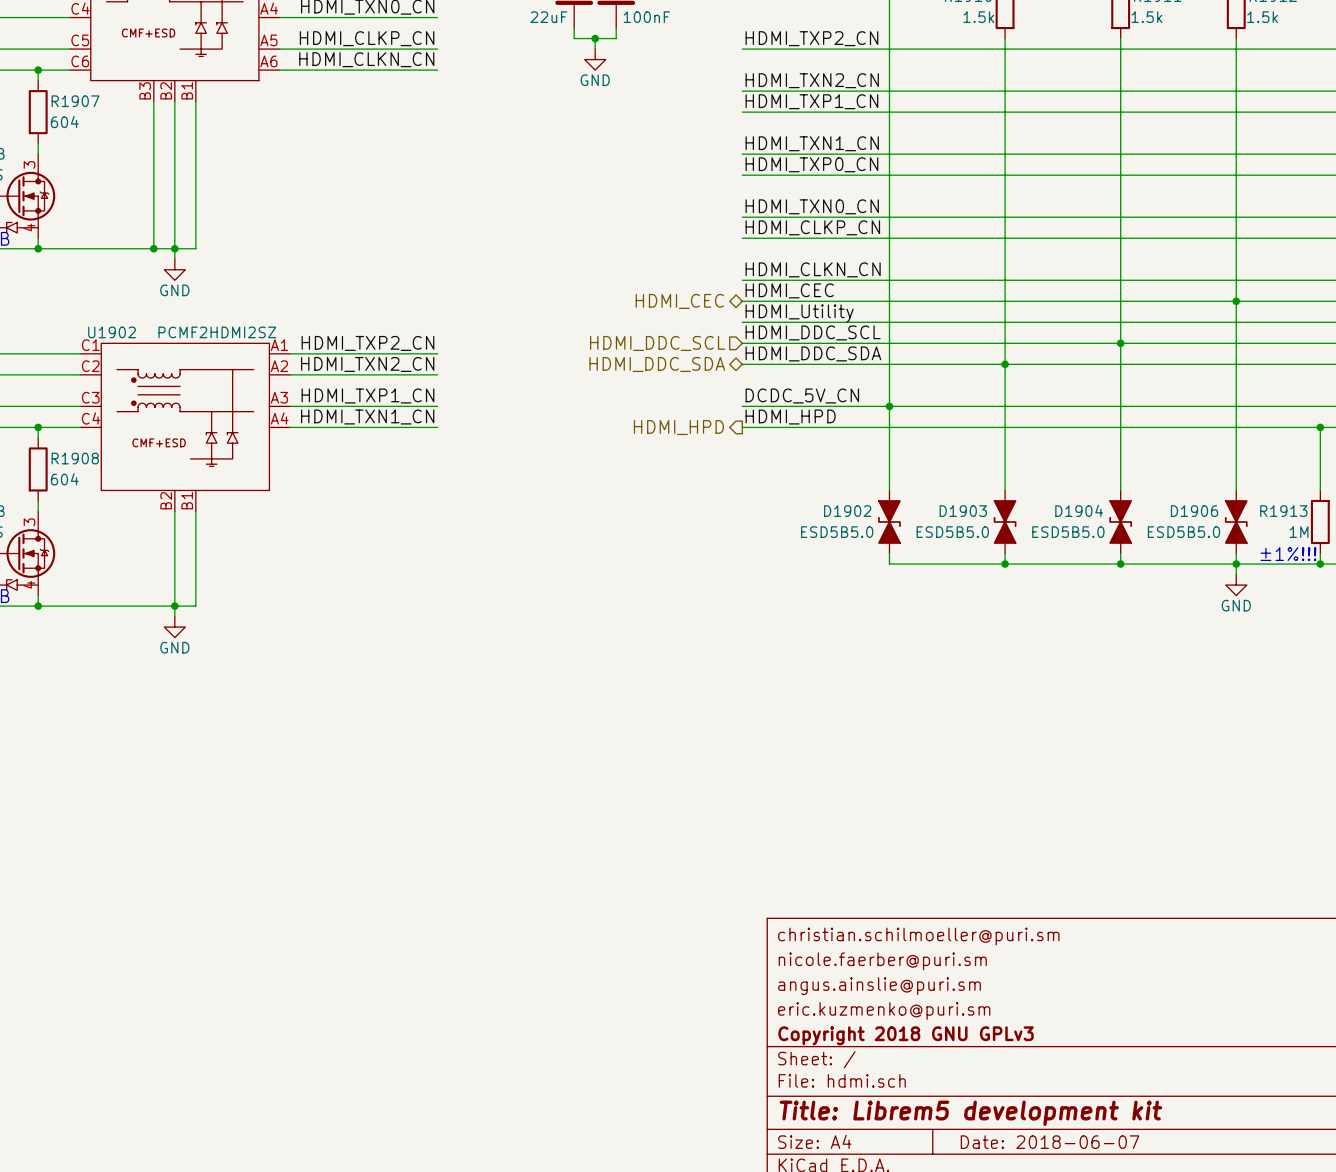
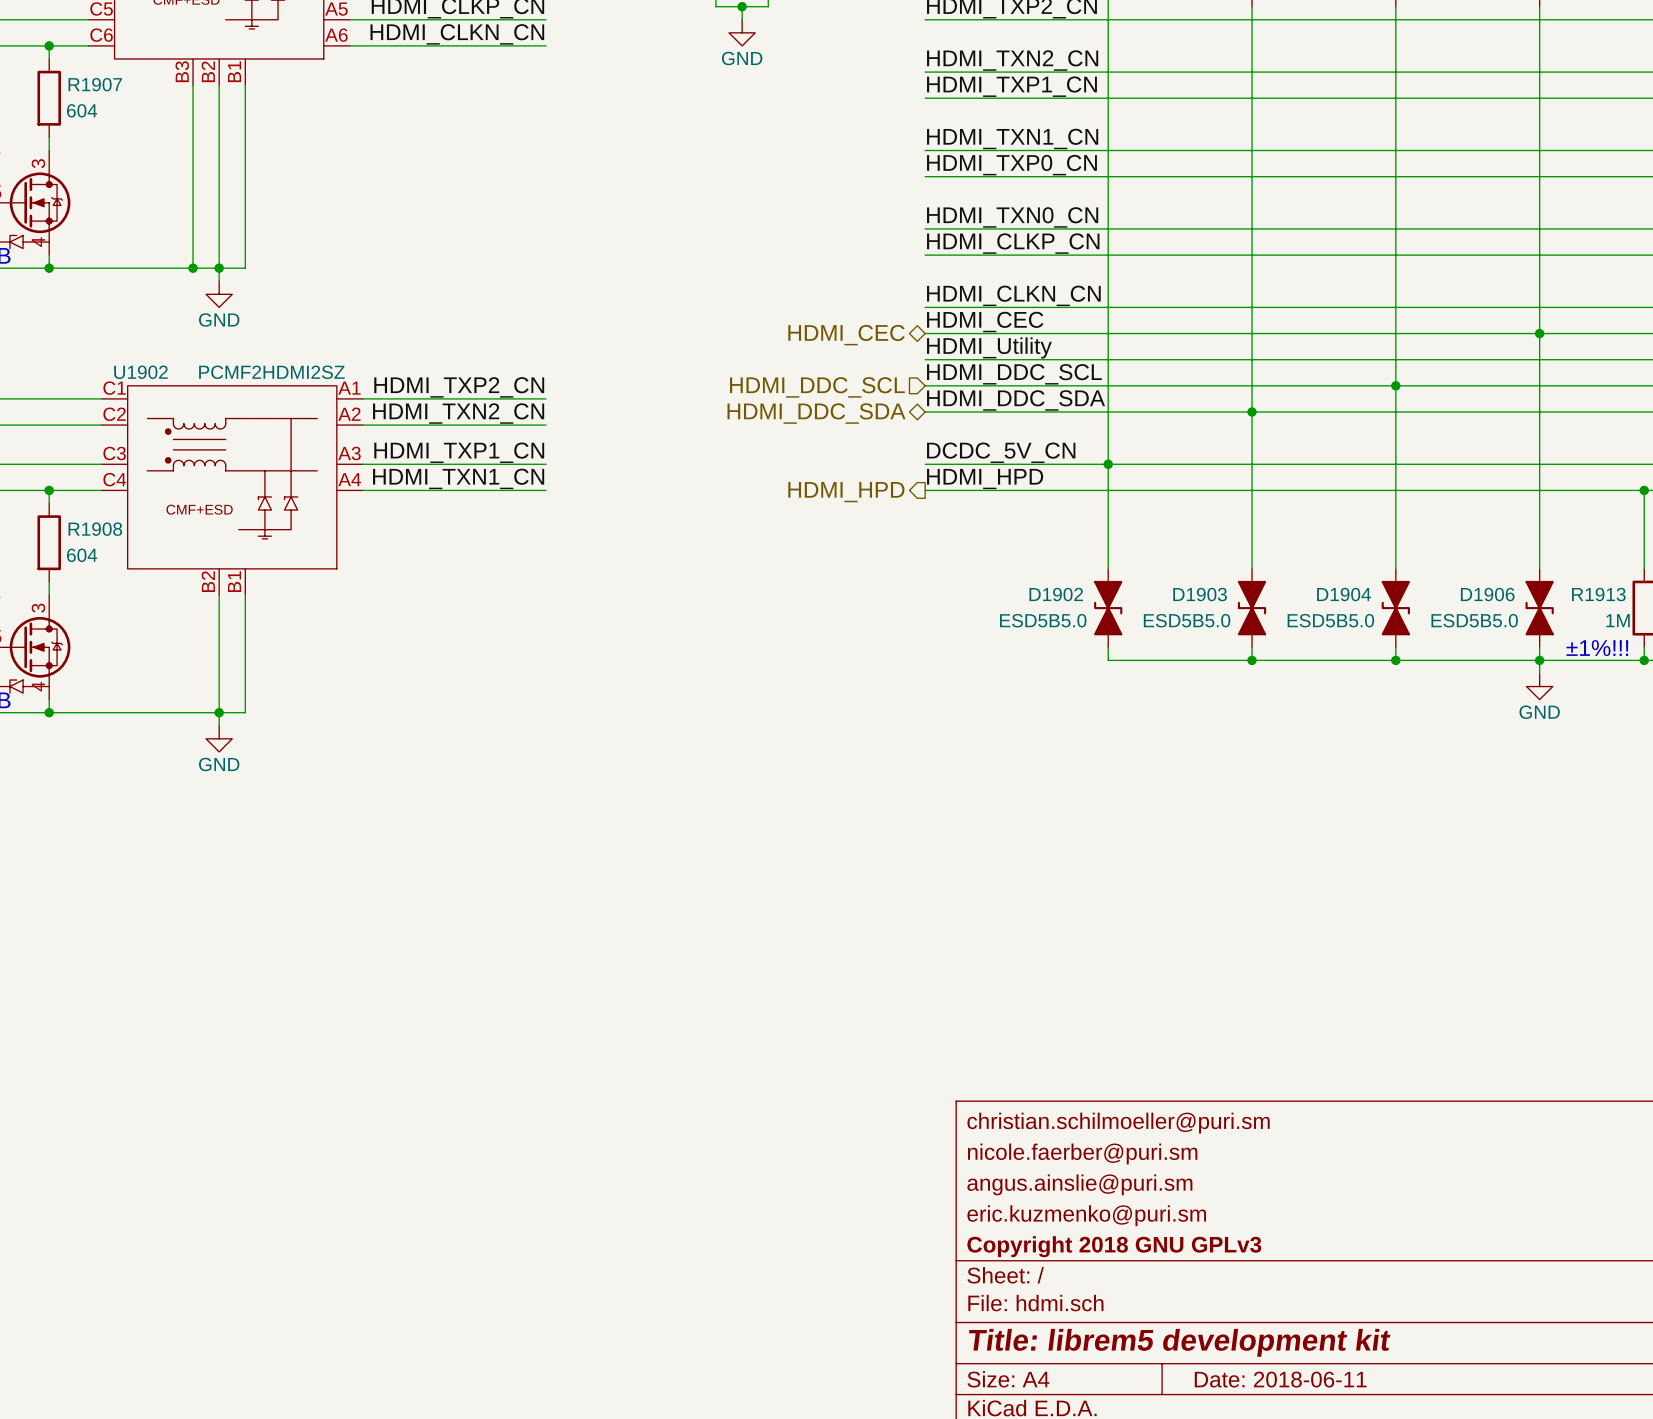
title block: Title: Librem5 development kit (970, 1113) -> Title: librem5 development kit (1179, 1342)
title block: Date: 2018-06-07 (1050, 1142) -> Date: 2018-06-11 (1280, 1379)

